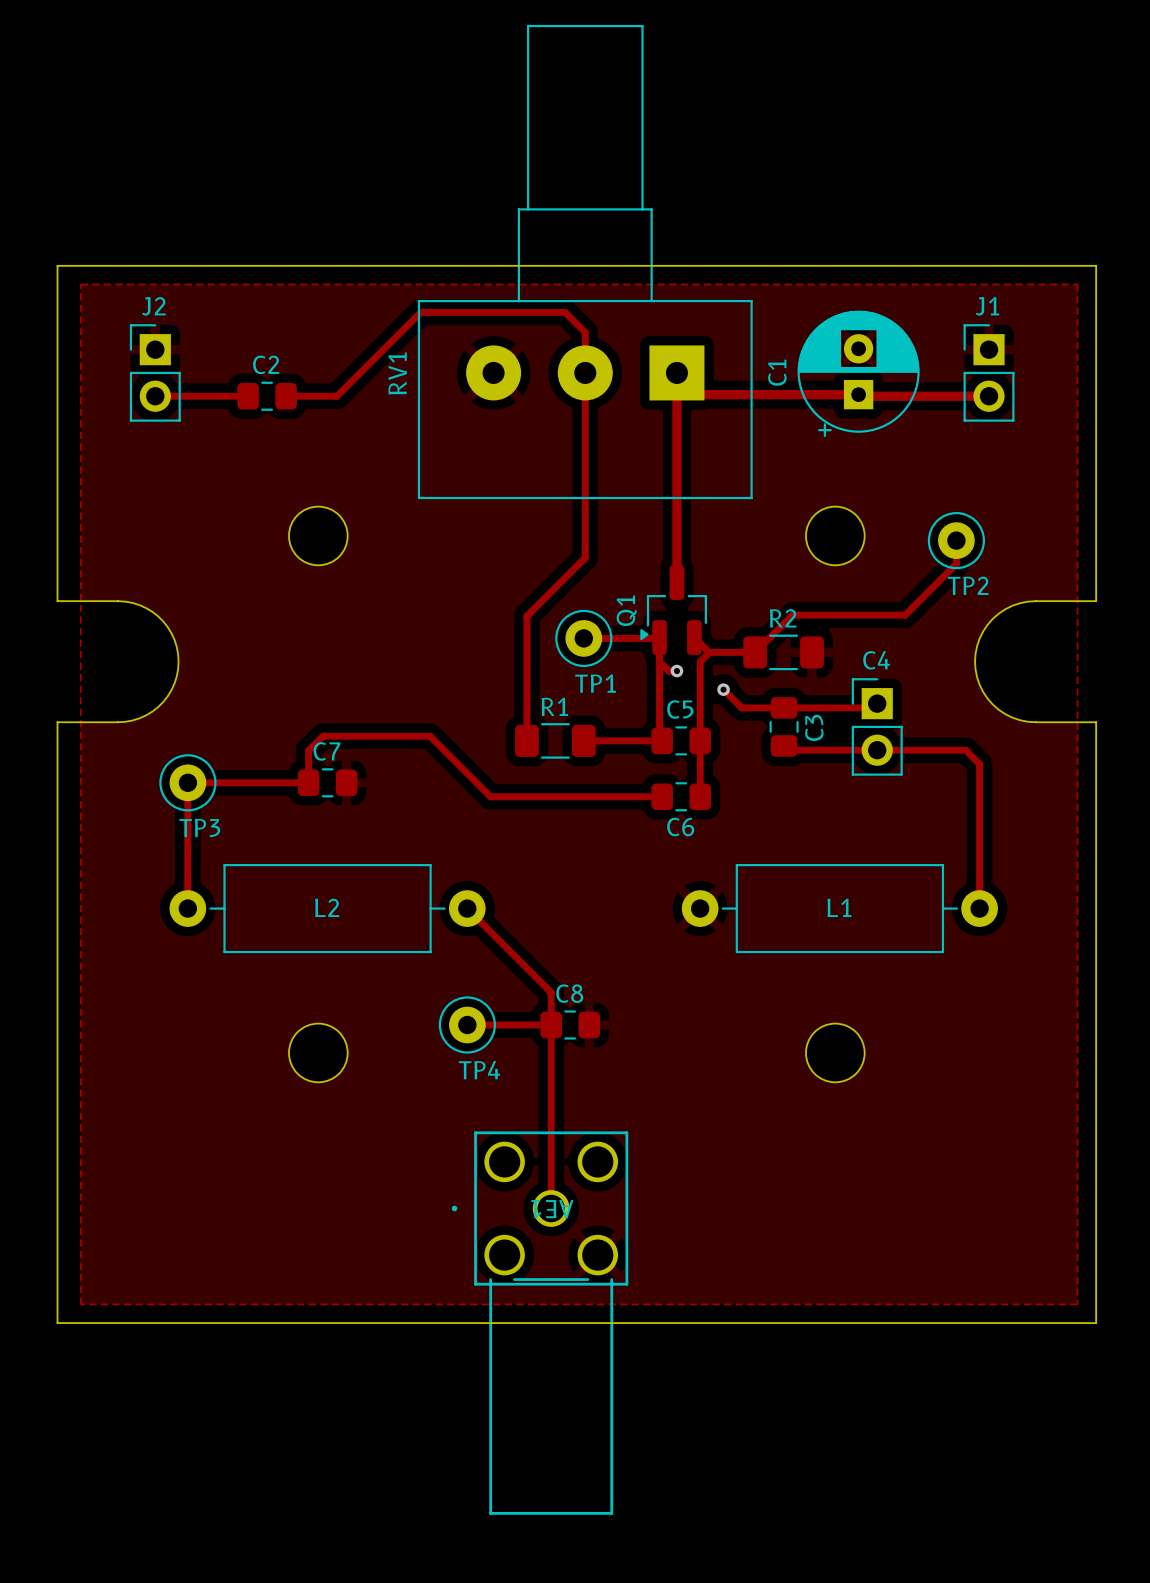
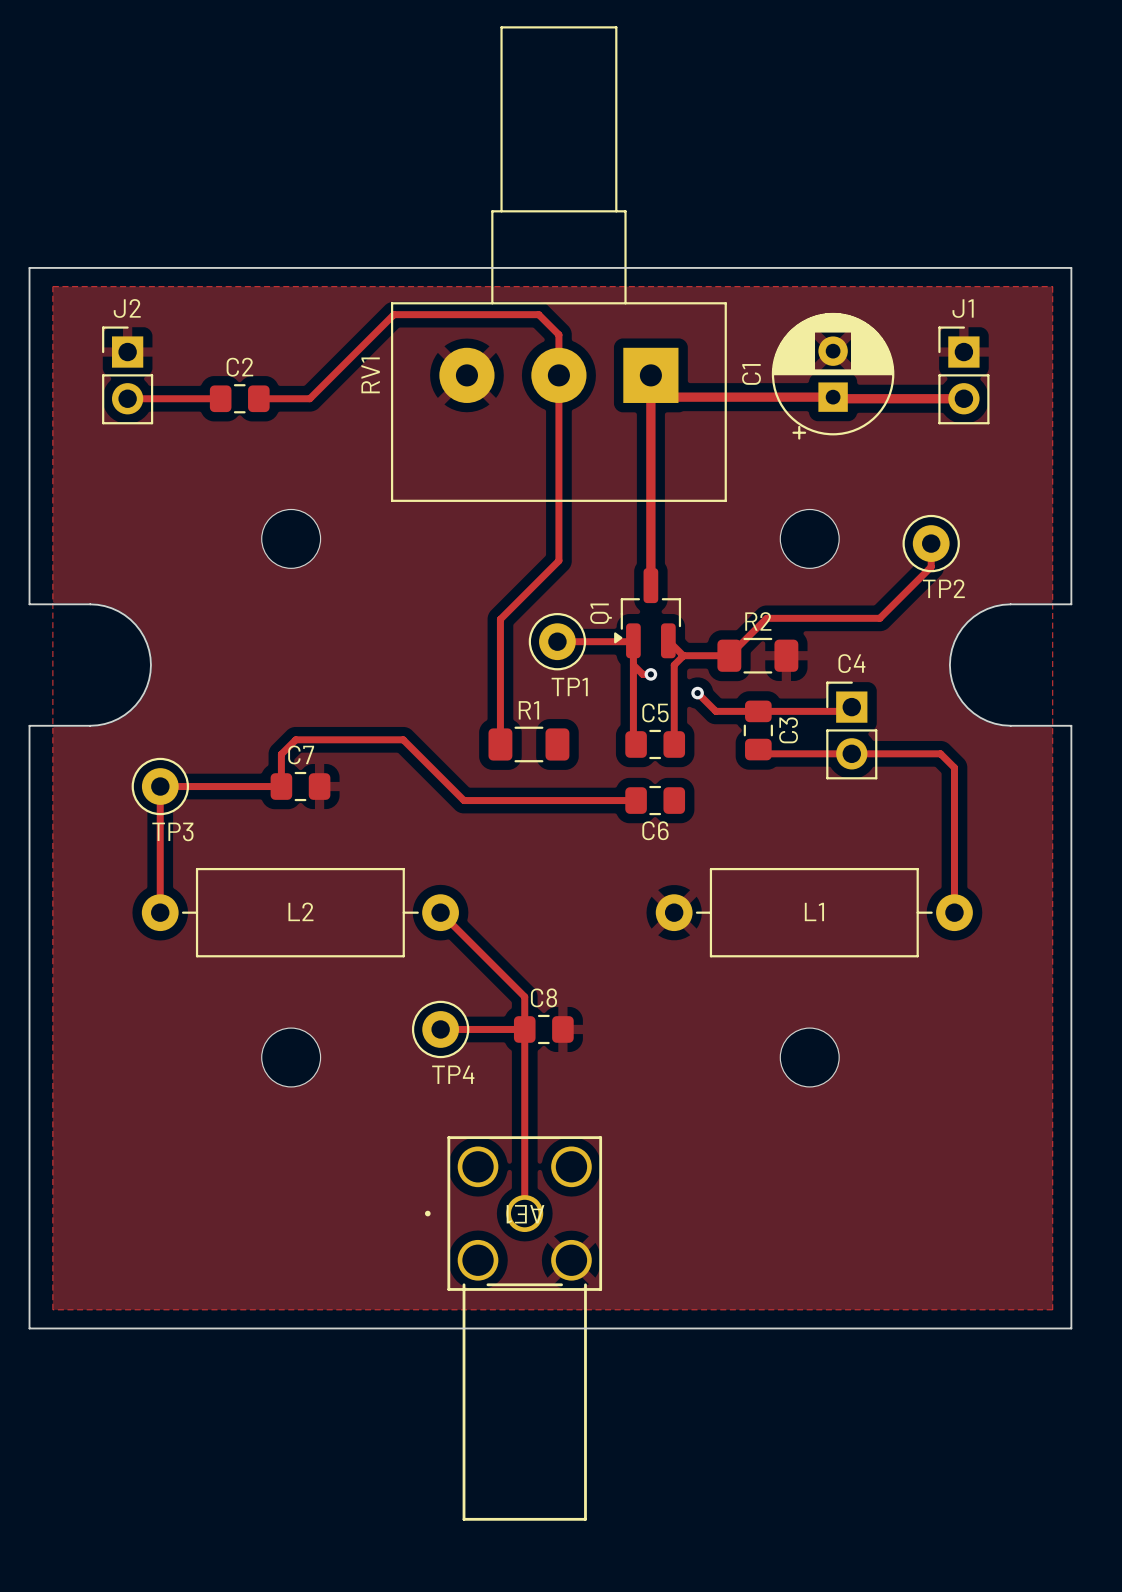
track: (583, 740) (662, 740) -> none
track: (700, 740) (700, 796) -> none

